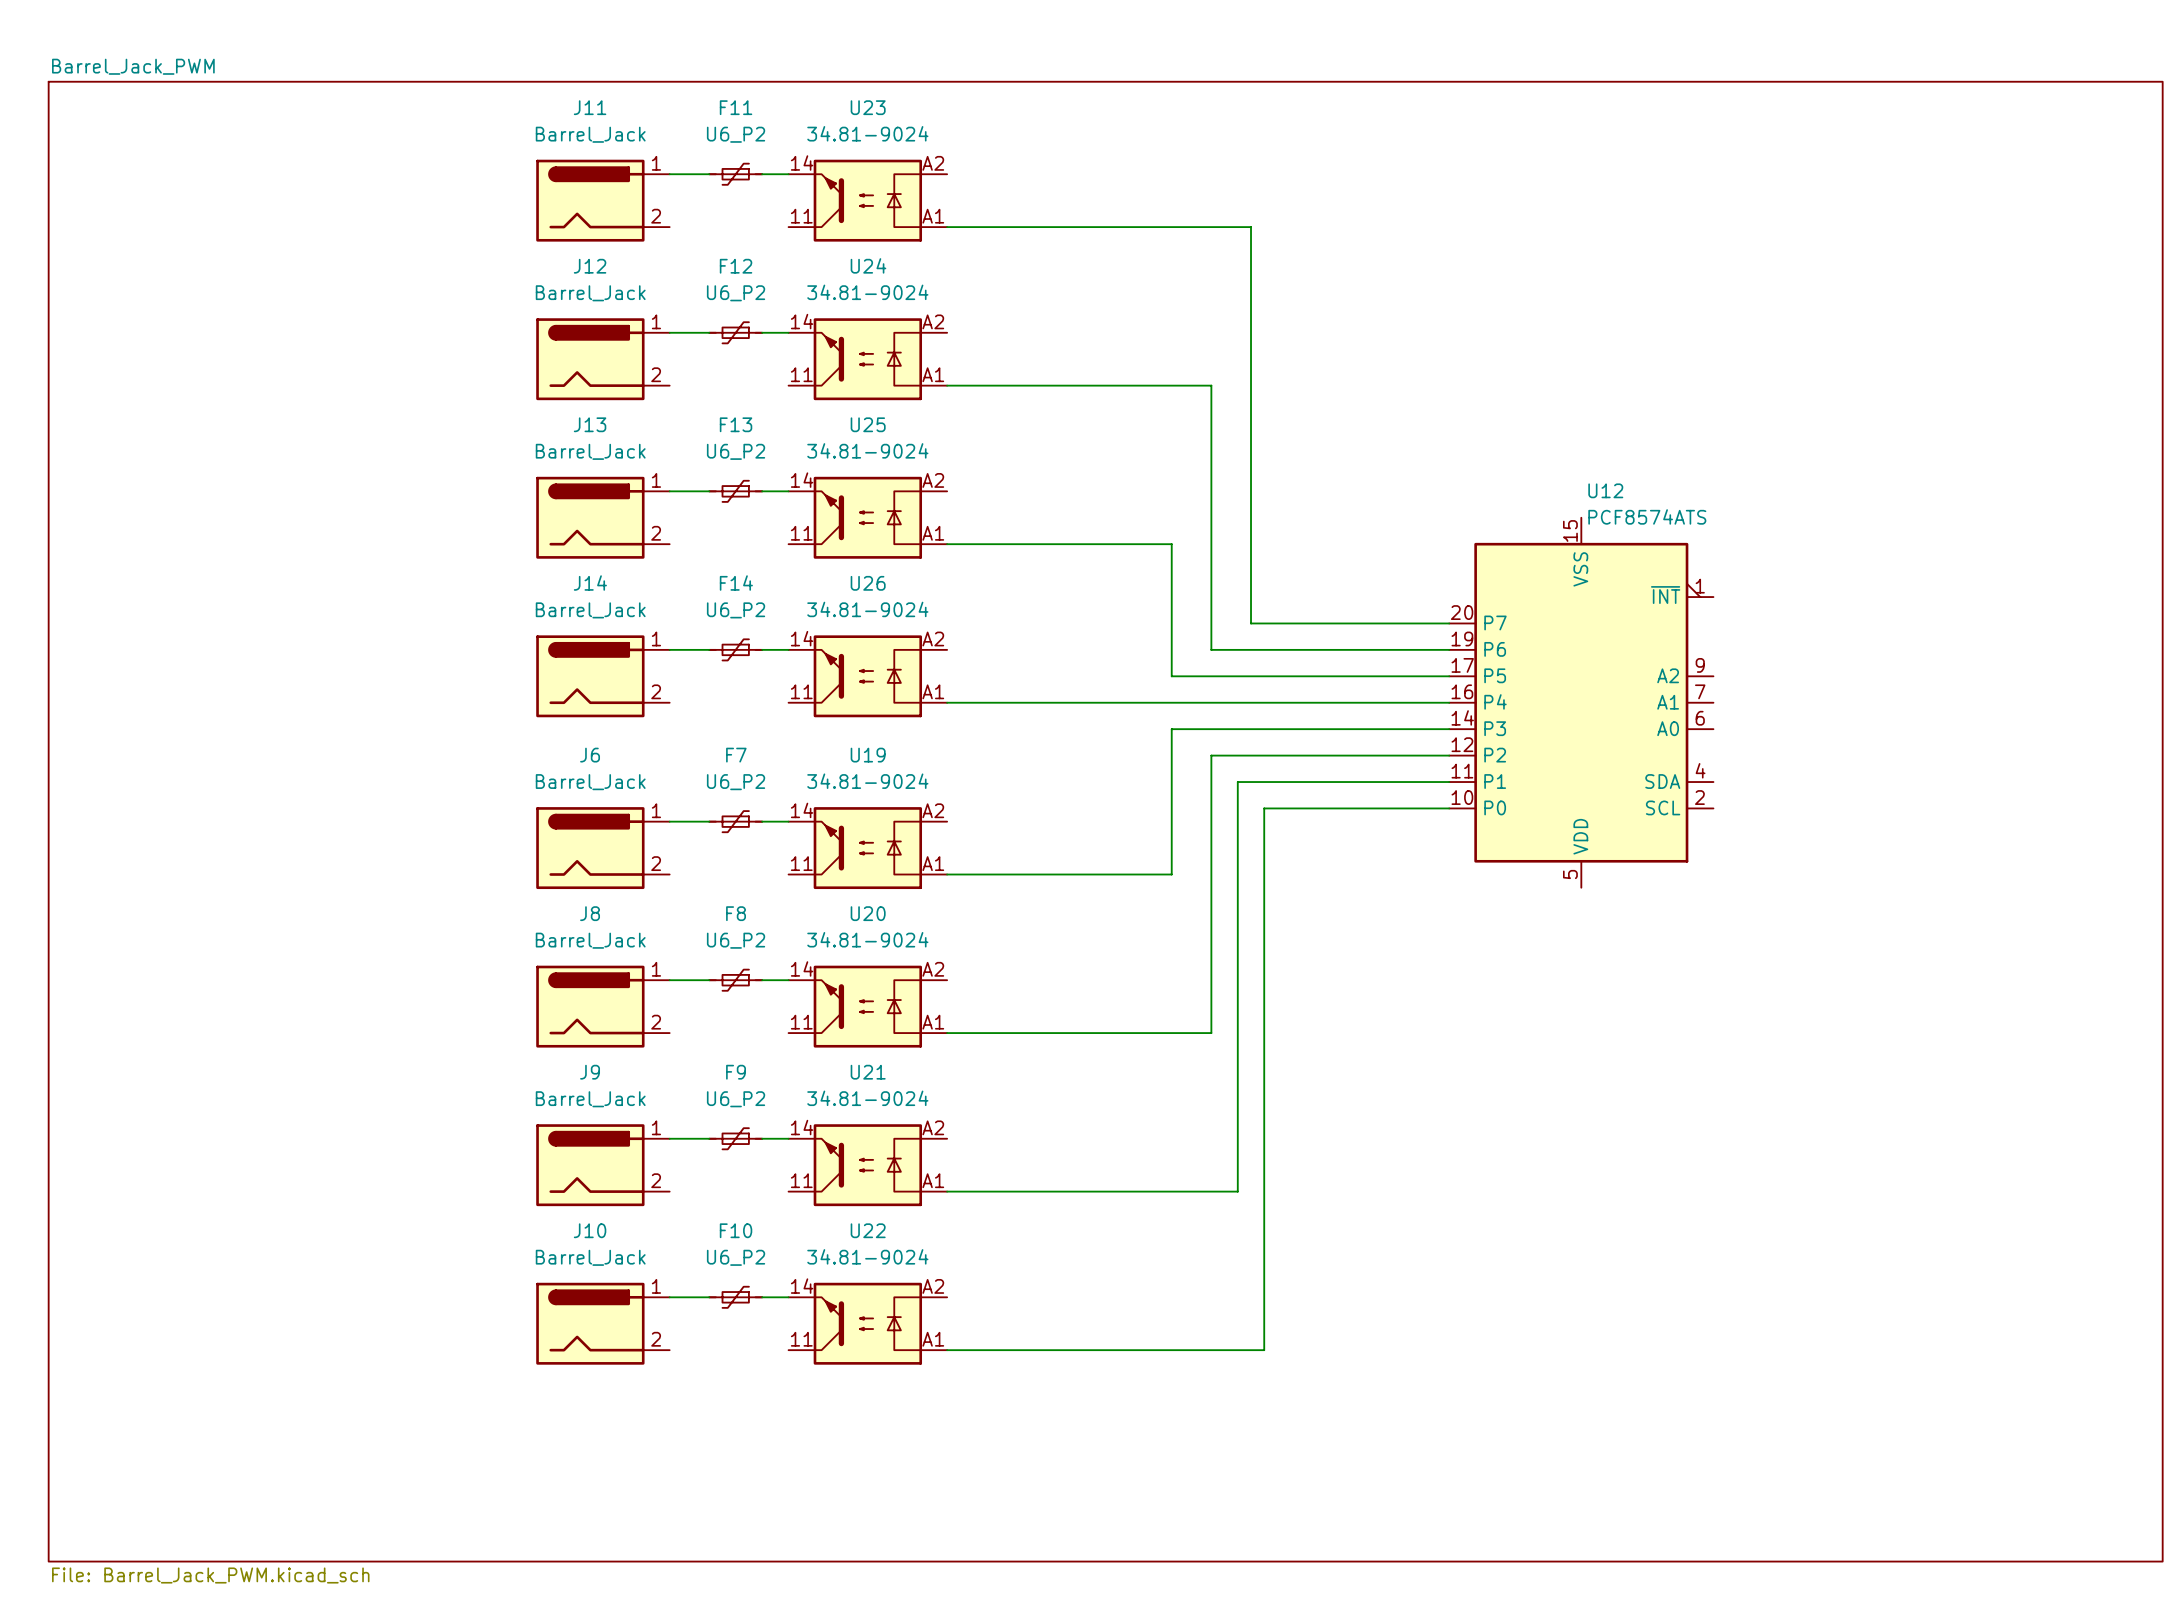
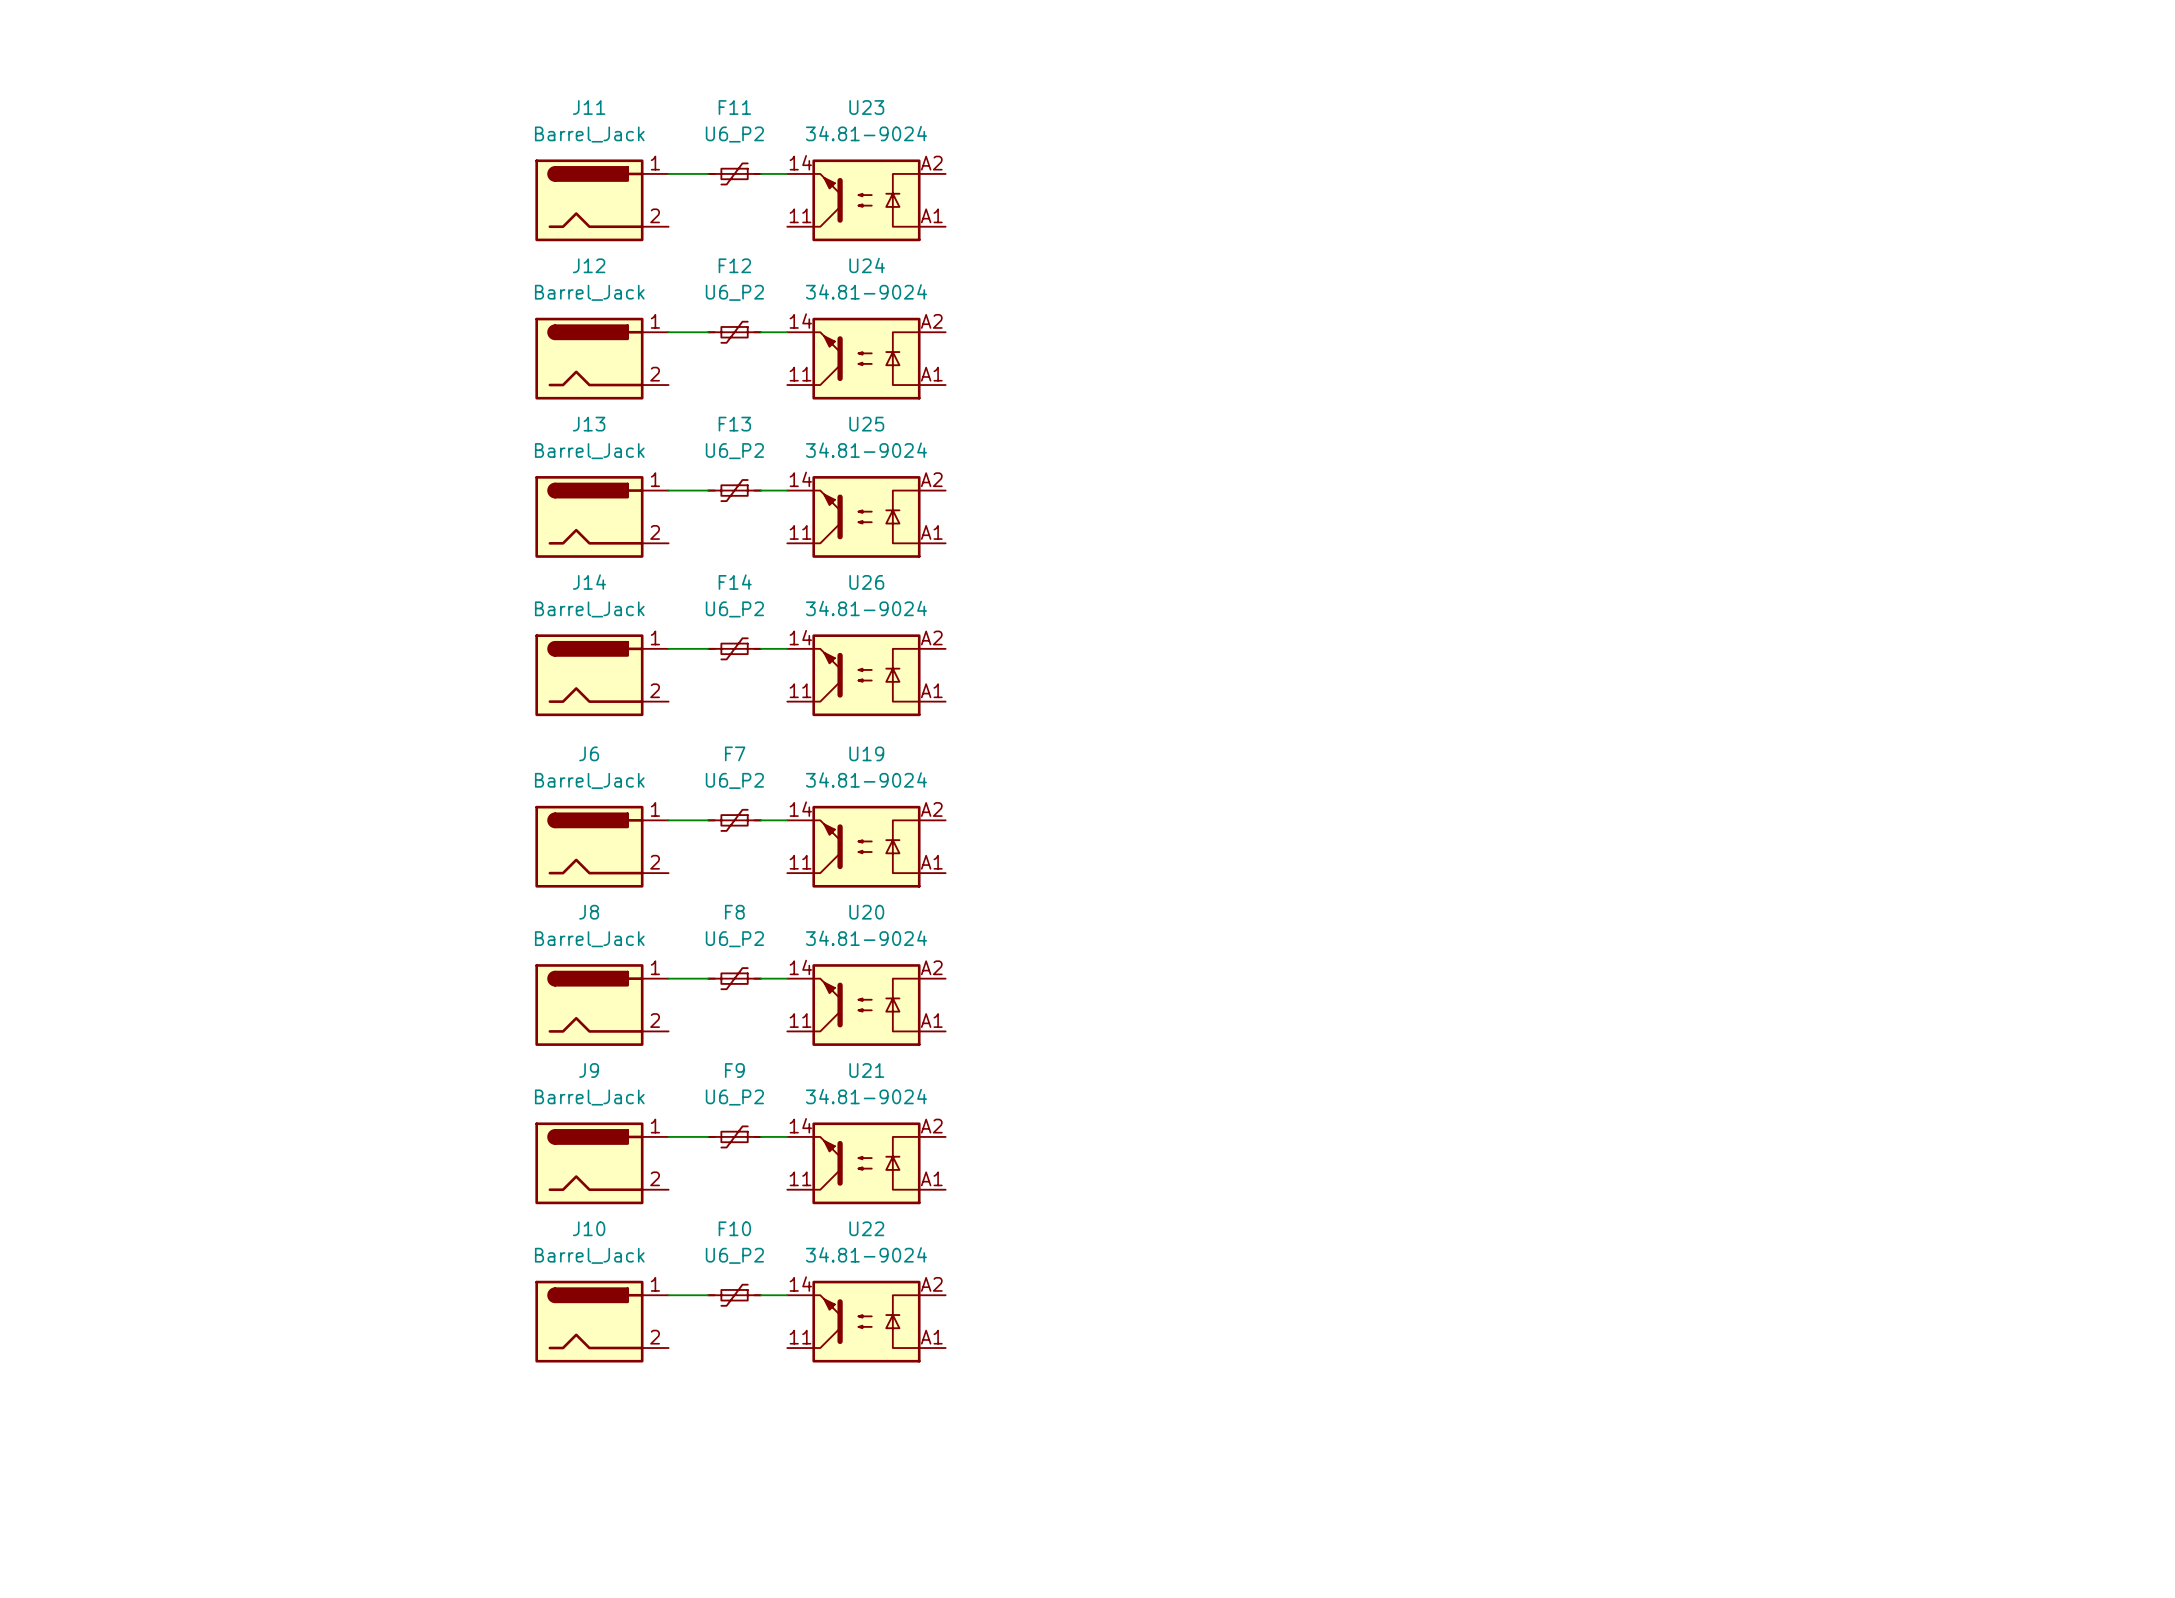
wire: (947, 227) (1251, 227) (1251, 623) (1449, 623) -> none
wire: (947, 385) (1211, 385) (1211, 649) (1449, 649) -> none
wire: (947, 544) (1171, 544) (1171, 676) (1449, 676) -> none
wire: (947, 702) (1449, 702) -> none
U12: PCF8574ATS (1581, 702) -> none
wire: (1449, 729) (1171, 729) (1171, 874) (947, 874) -> none
wire: (1449, 755) (1211, 755) (1211, 1033) (947, 1033) -> none
wire: (1449, 782) (1237, 782) (1237, 1191) (947, 1191) -> none
wire: (1449, 808) (1264, 808) (1264, 1350) (947, 1350) -> none
sheet Barrel_Jack_PWM: File: Barrel_Jack_PWM.kicad_sch (1105, 821) -> none

